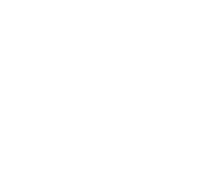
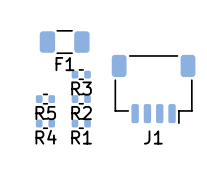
F1: none -> (64, 42)
R3: none -> (81, 74)
J1: none -> (153, 89)
R5: none -> (45, 99)
R2: none -> (81, 99)
R4: none -> (45, 123)
R1: none -> (81, 123)

